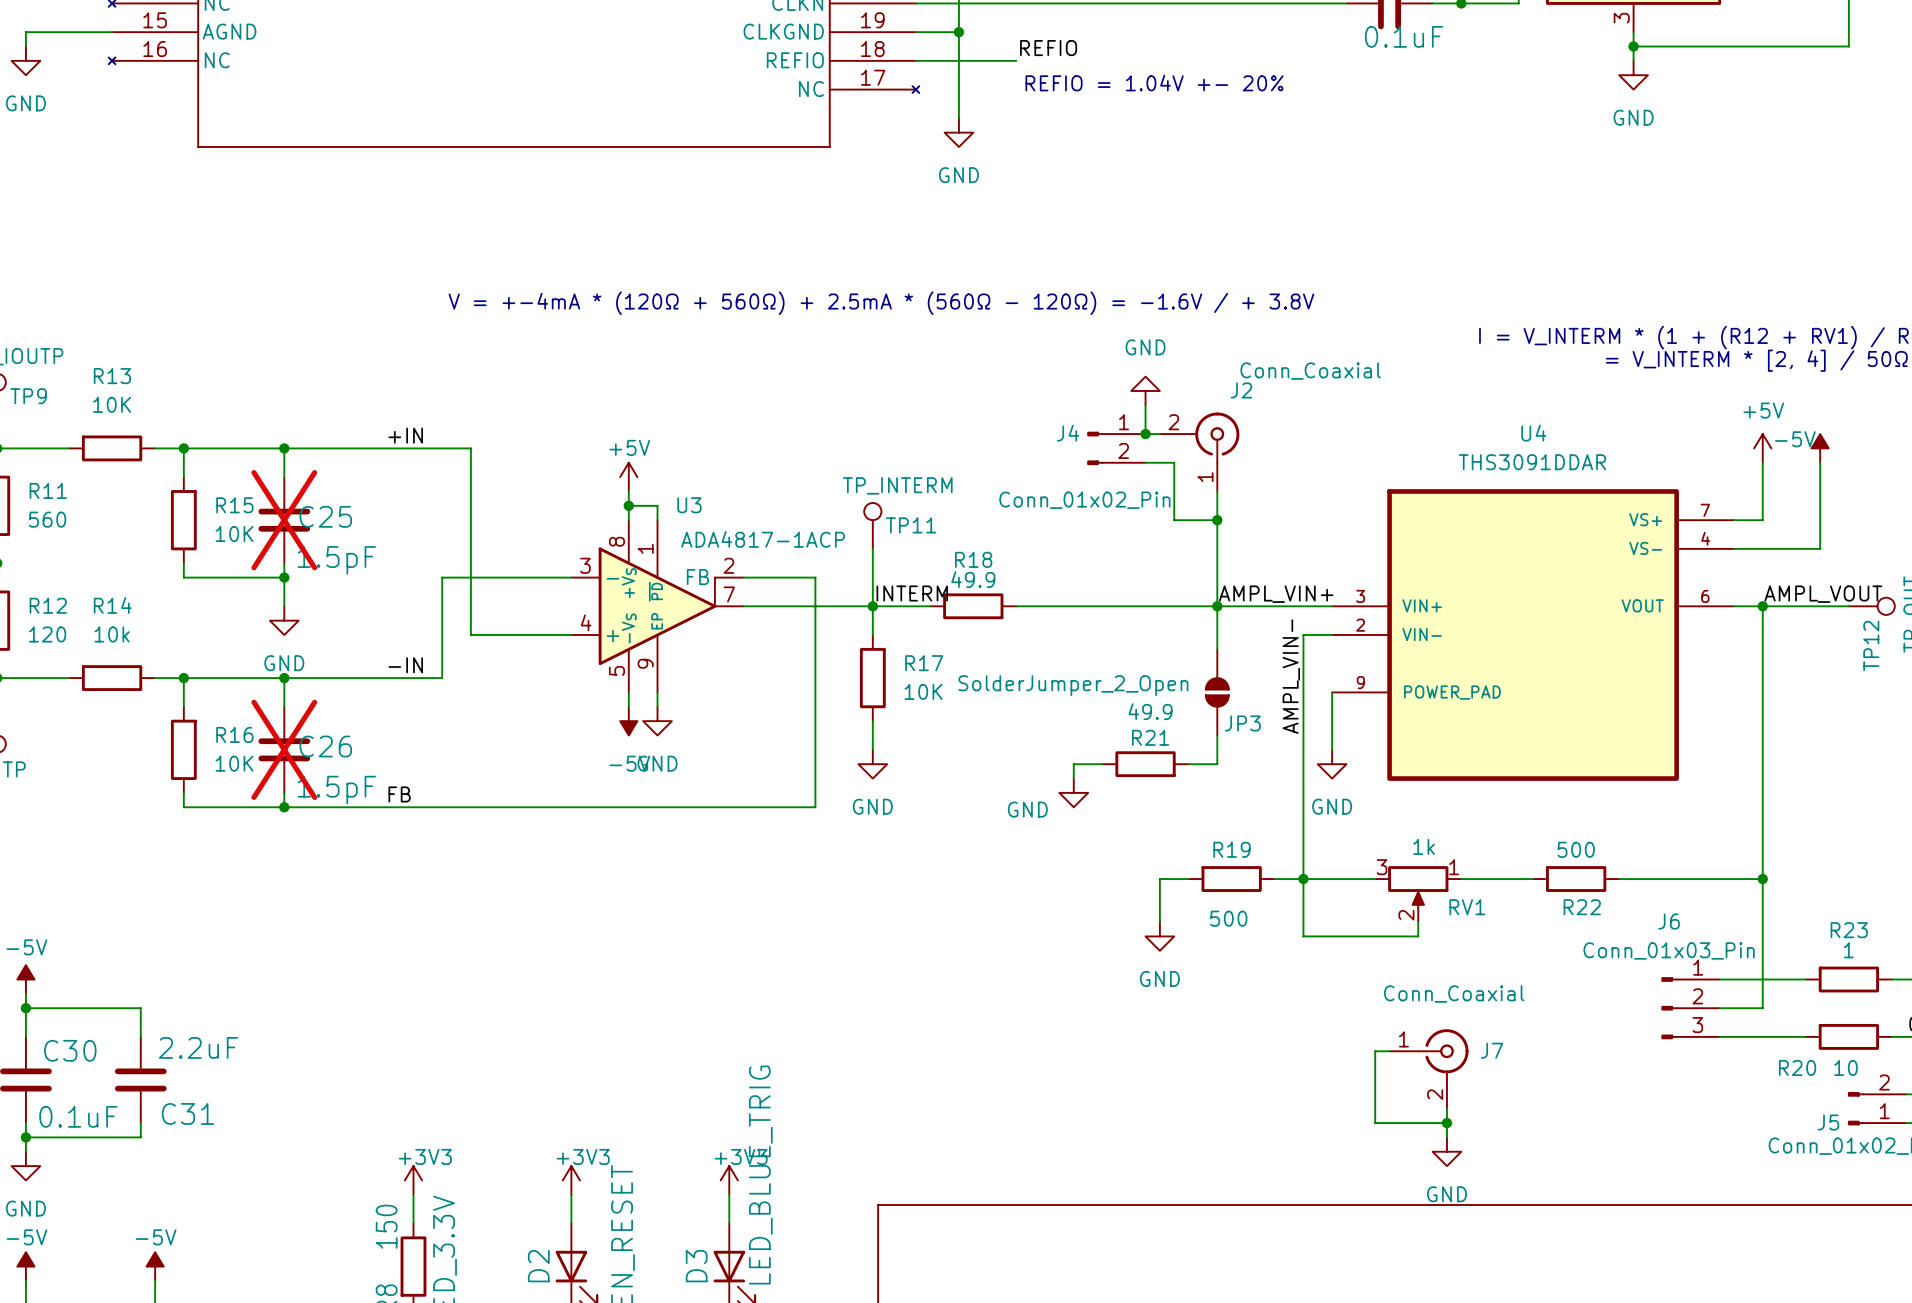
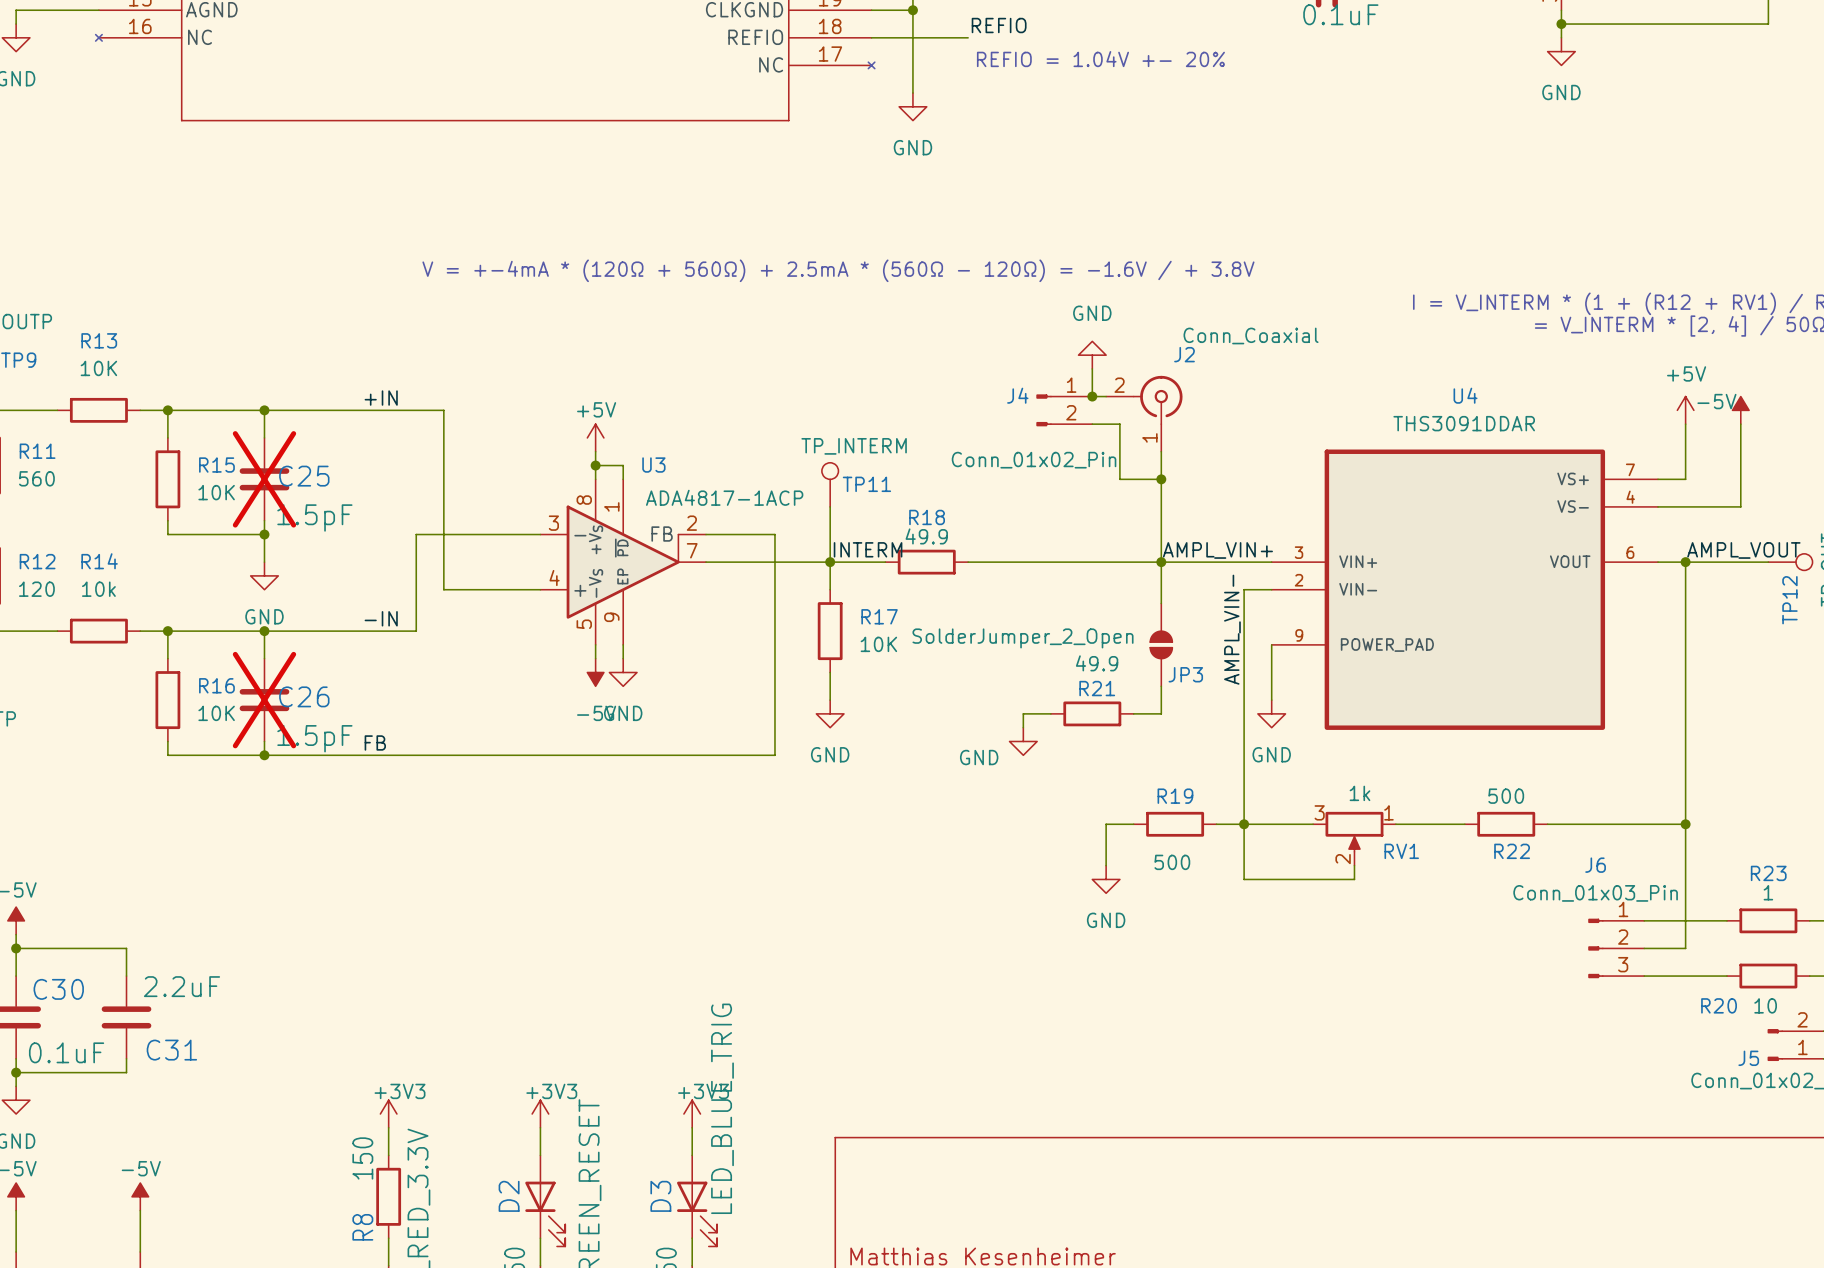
wire: (1389, 1051) (1375, 1051) (1375, 1123) (1446, 1123) -> none
J7: Conn_Coaxial (1429, 1068) -> none
wire: (1446, 1108) (1446, 1137) -> none
junction: (1446, 1123) -> none
power symbol: GND (1446, 1151) -> none

